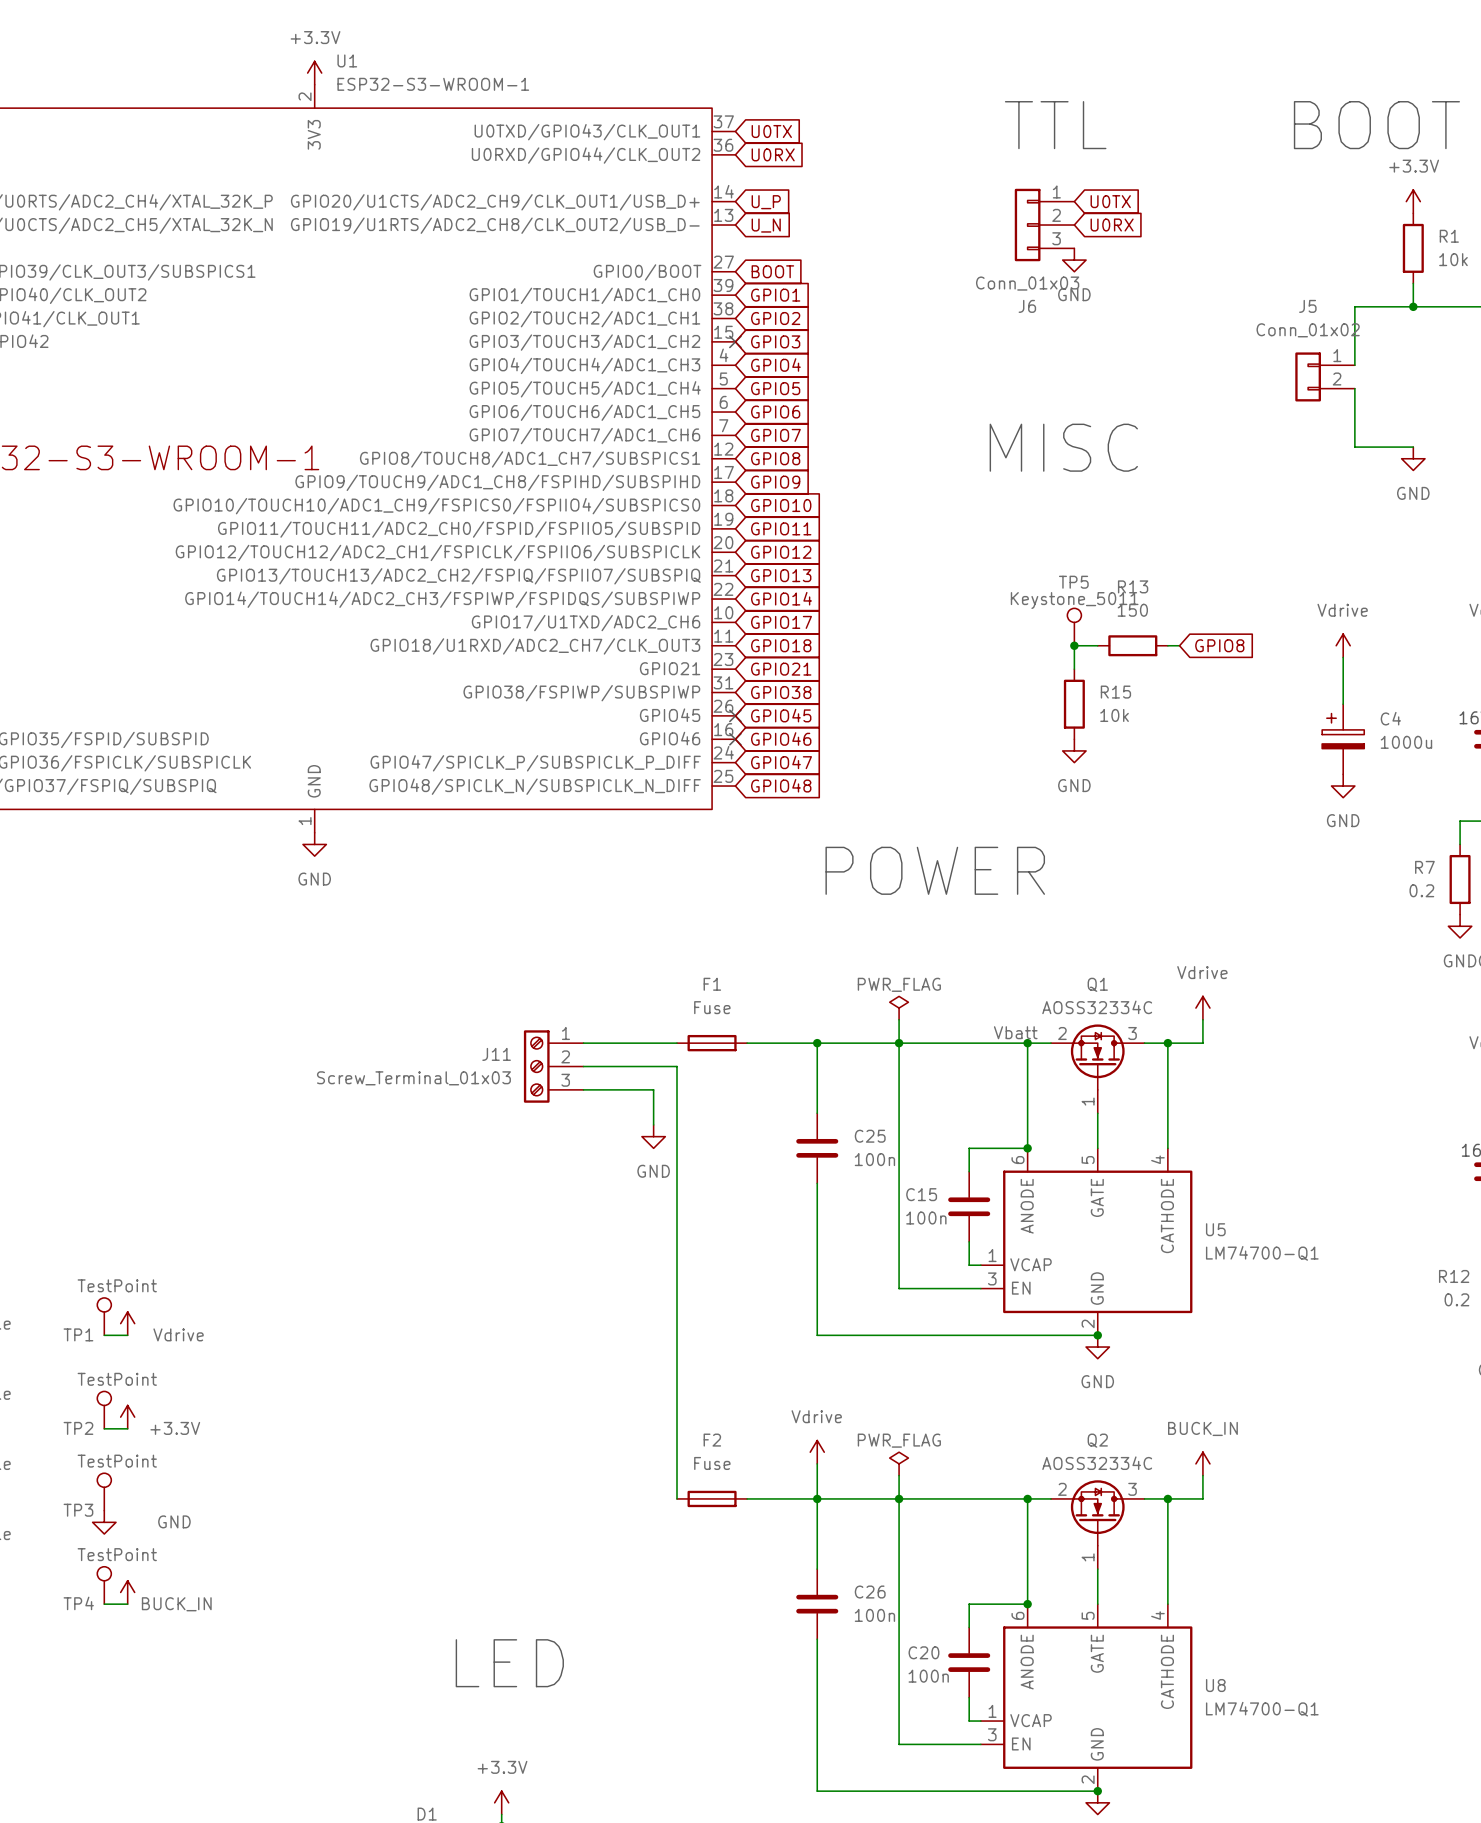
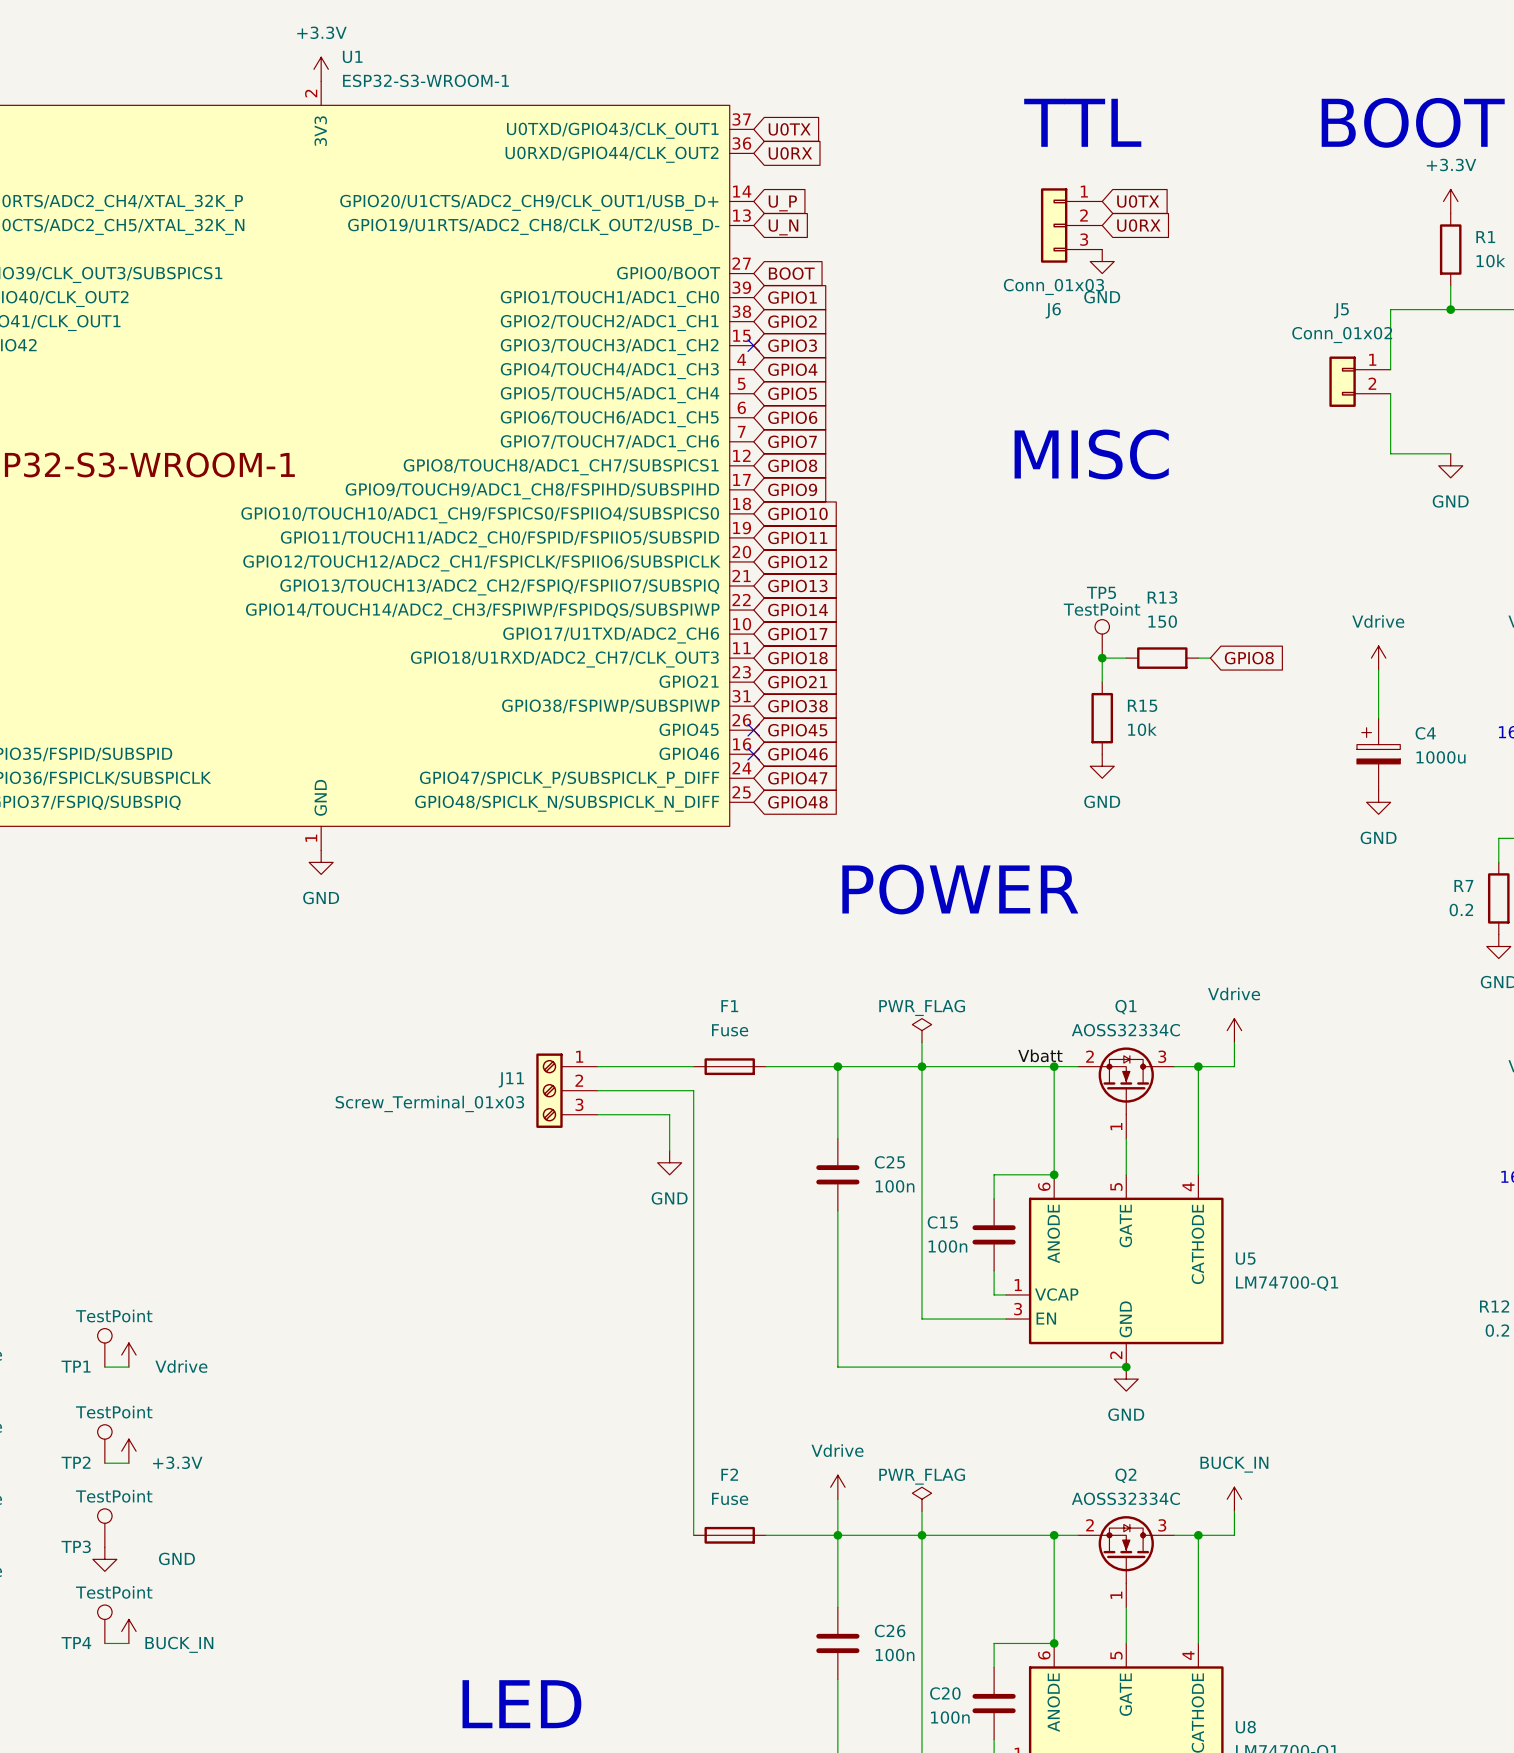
TP5 value: Keystone_5011 (1074, 600) -> TestPoint (1102, 609)

